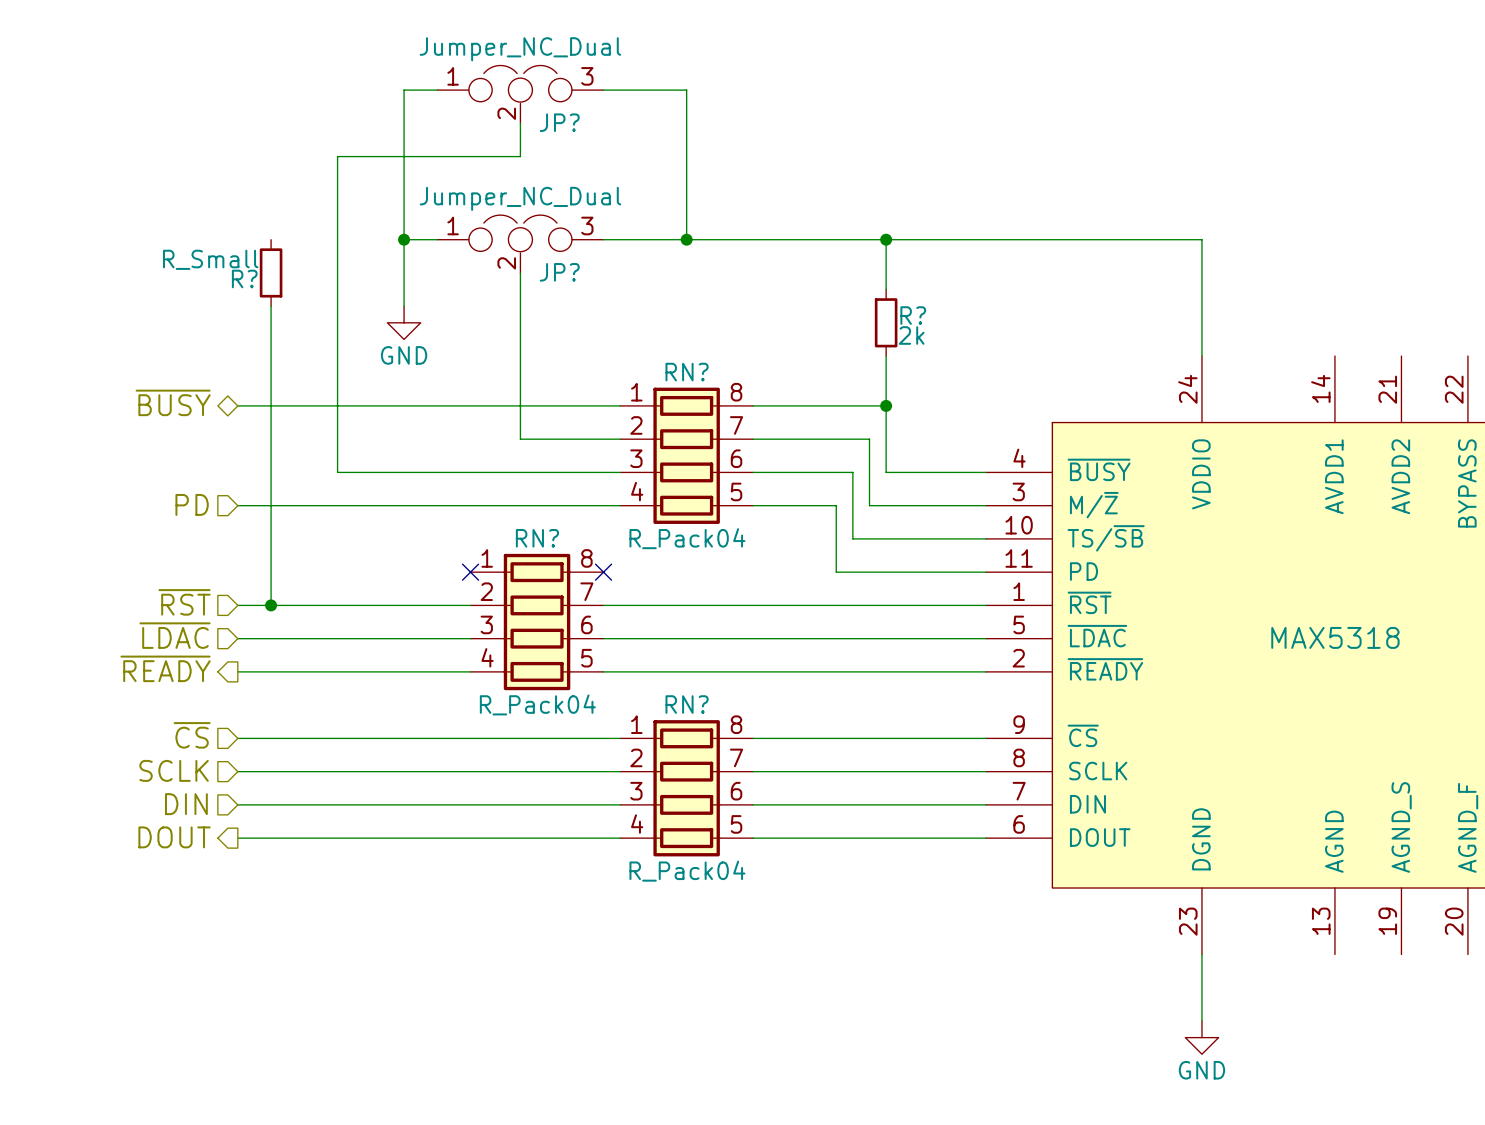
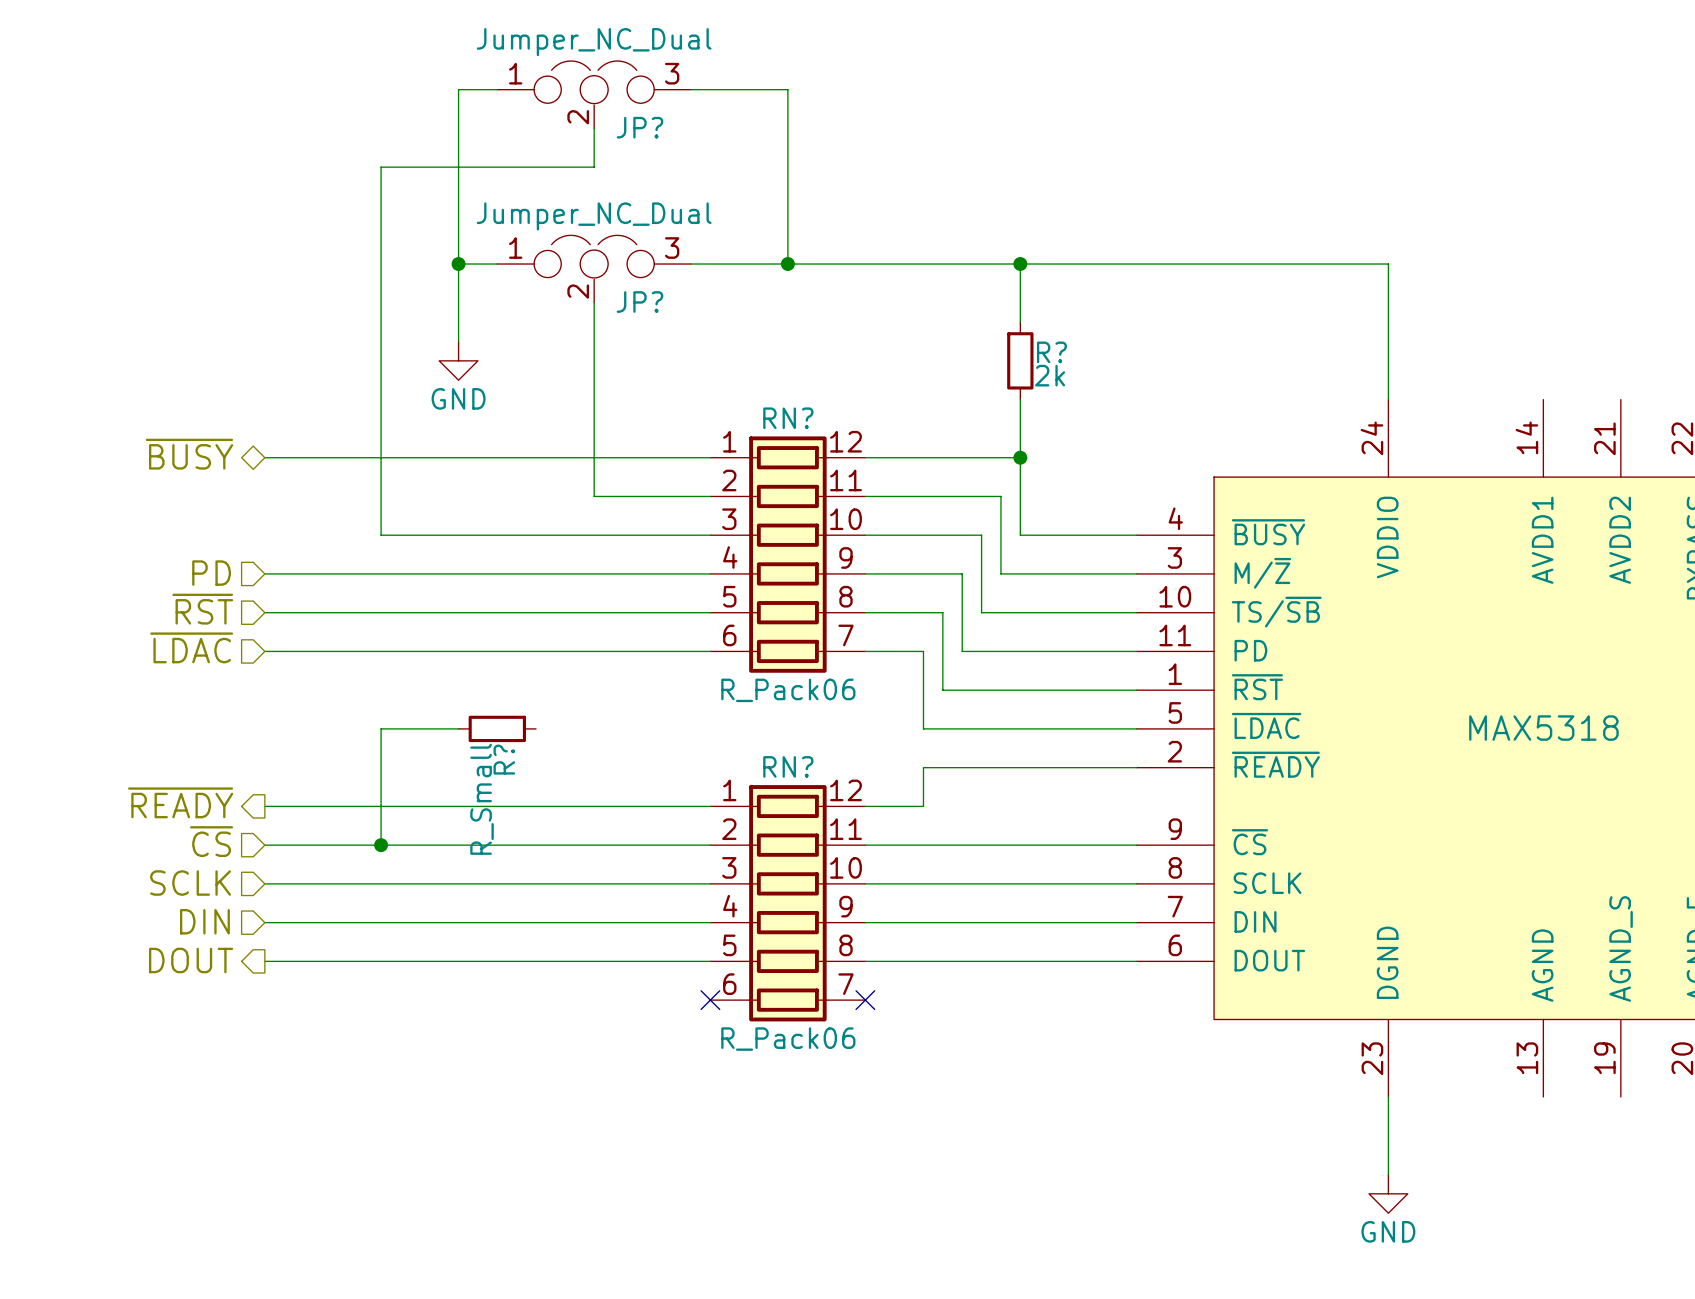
R?: R_Small (271, 272) -> none
wire: (271, 306) (271, 605) -> none
RN?: R_Pack04 (686, 455) -> none
RN?: none -> R_Pack06 (787, 554)
wire: none -> (264, 612) (710, 612)
wire: none -> (264, 651) (710, 651)
no-connect mark: (470, 572) -> none
no-connect mark: (603, 572) -> none
hierarchical label position: ~{RST} (184, 602) -> ~{RST} (202, 609)
wire: (237, 605) (470, 605) -> none
junction: (271, 605) -> none
wire: (603, 605) (819, 605) -> (865, 612) (942, 612) (942, 690)
RN?: R_Pack04 (537, 622) -> none
hierarchical label position: ~{LDAC} (175, 635) -> ~{LDAC} (191, 647)
wire: (237, 638) (337, 638) -> (381, 845) (381, 728)
wire: (404, 638) (470, 638) -> none
R?: none -> R_Small (497, 728)
wire: (603, 638) (803, 638) -> (865, 651) (923, 651) (923, 728)
hierarchical label position: ~{READY} (165, 668) -> ~{READY} (180, 802)
wire: (237, 671) (470, 671) -> none
wire: (603, 671) (803, 671) -> (865, 806) (923, 806) (923, 767)
RN? name position: RN? (687, 704) -> RN? (788, 766)
wire: none -> (264, 806) (710, 806)
RN? symbol: [620, 720, 754, 857] -> [710, 785, 866, 1022]
junction: none -> (381, 845)
no-connect mark: none -> (710, 1000)
RN? value: R_Pack04 (687, 871) -> R_Pack06 (788, 1039)
no-connect mark: none -> (865, 1000)

